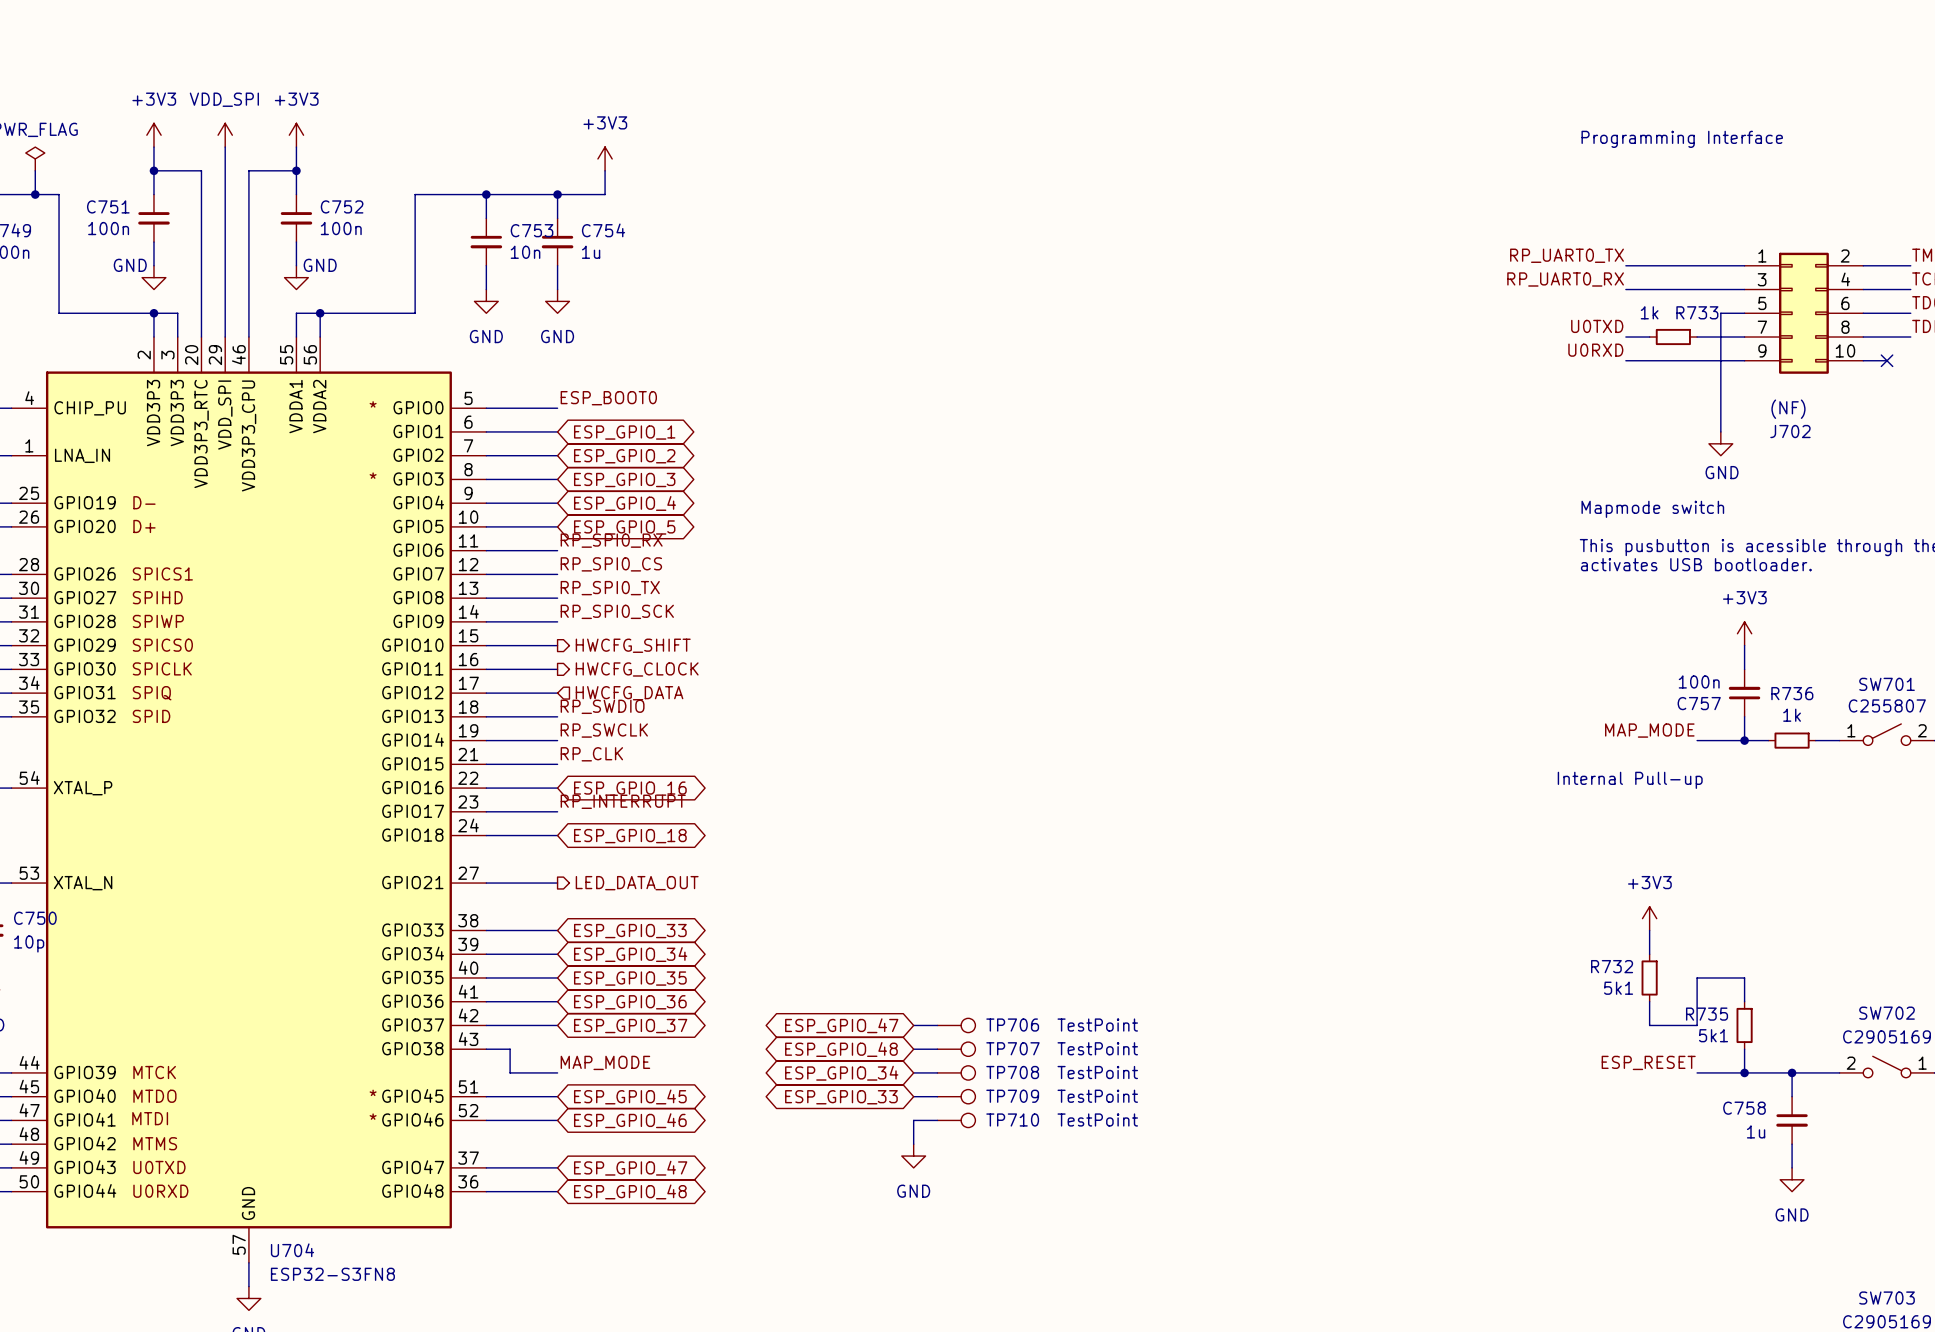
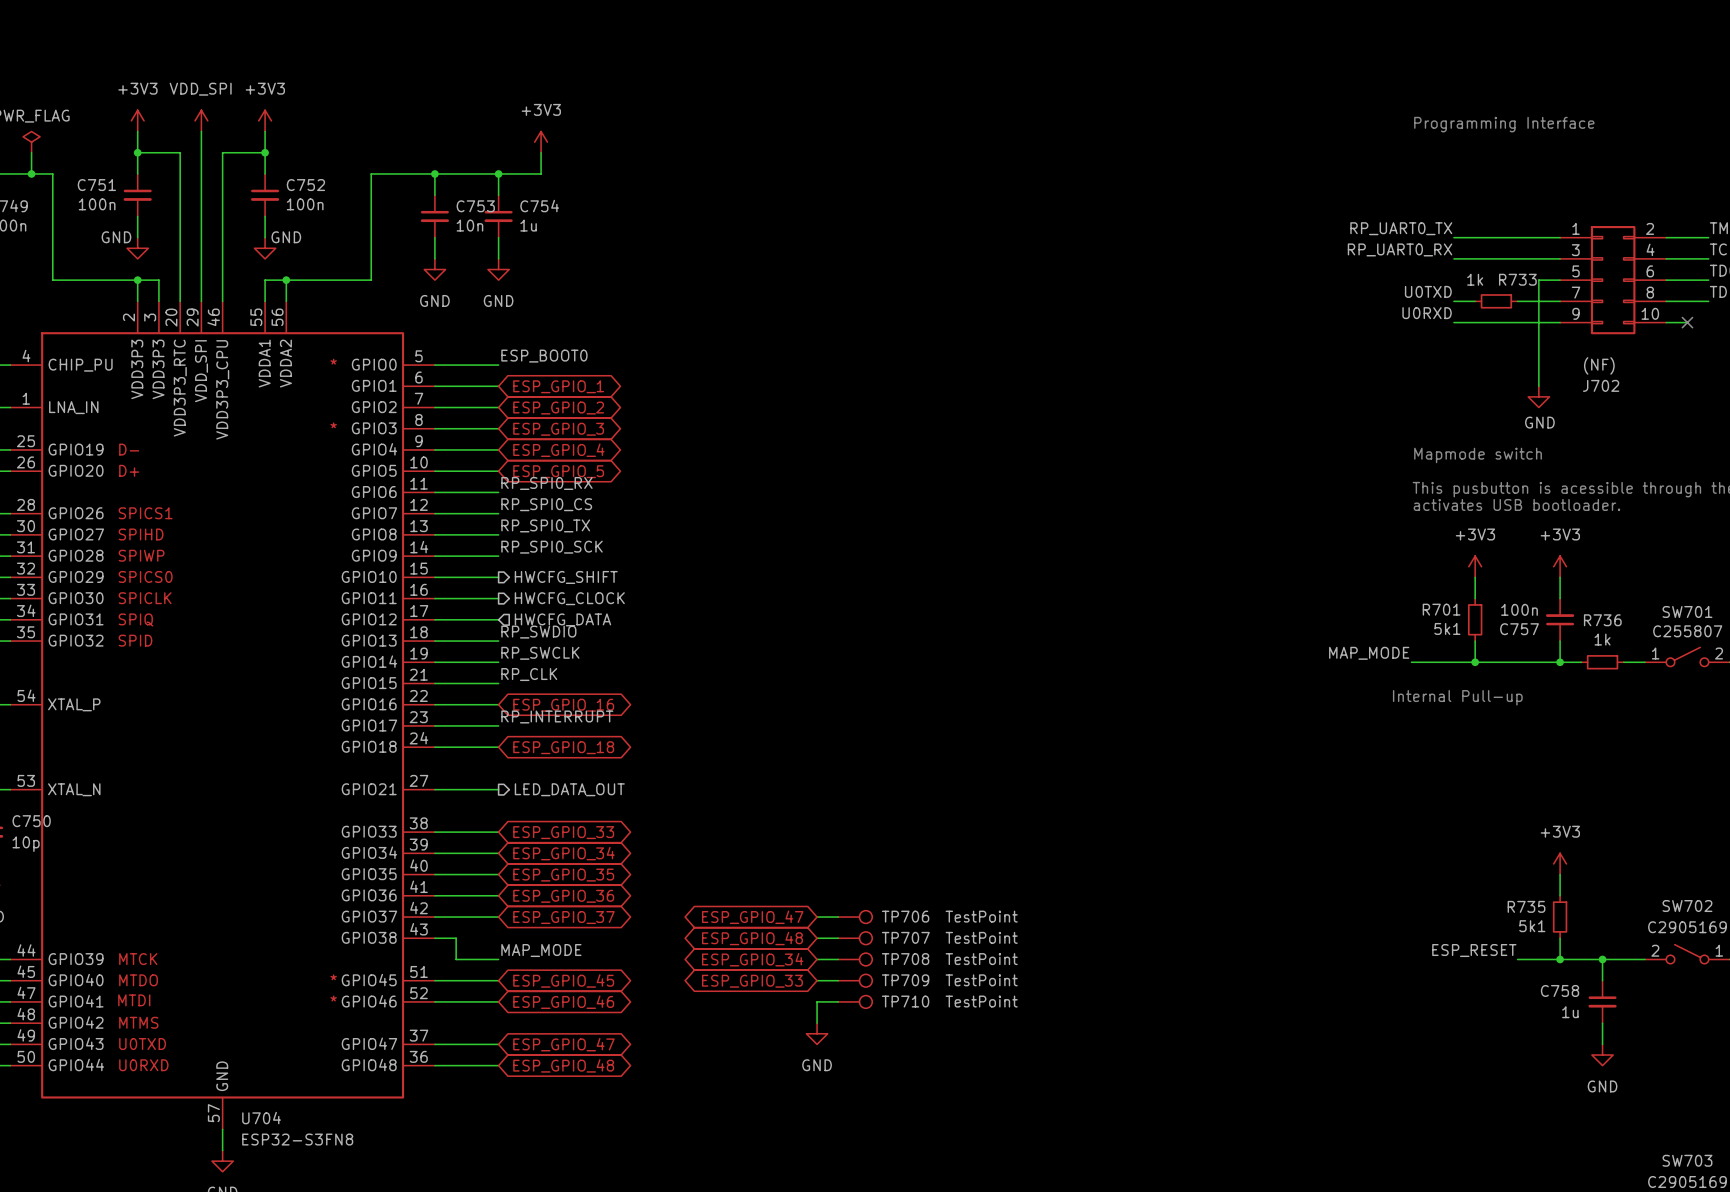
power symbol: none -> +3V3 (1475, 566)
wire: none -> (1475, 577) (1475, 598)
R701: none -> 5k1 (1475, 619)
label position: MAP_MODE (1649, 730) -> MAP_MODE (1369, 653)
wire: none -> (1411, 662) (1517, 662)
junction: none -> (1475, 662)
power symbol position: +3V3 (1649, 918) -> +3V3 (1560, 863)
wire: (1649, 930) (1649, 954) -> (1475, 641) (1475, 662)
R732: 5k1 (1649, 977) -> none
wire: (1744, 977) (1697, 977) (1697, 1025) (1649, 1025) (1649, 1001) -> none

